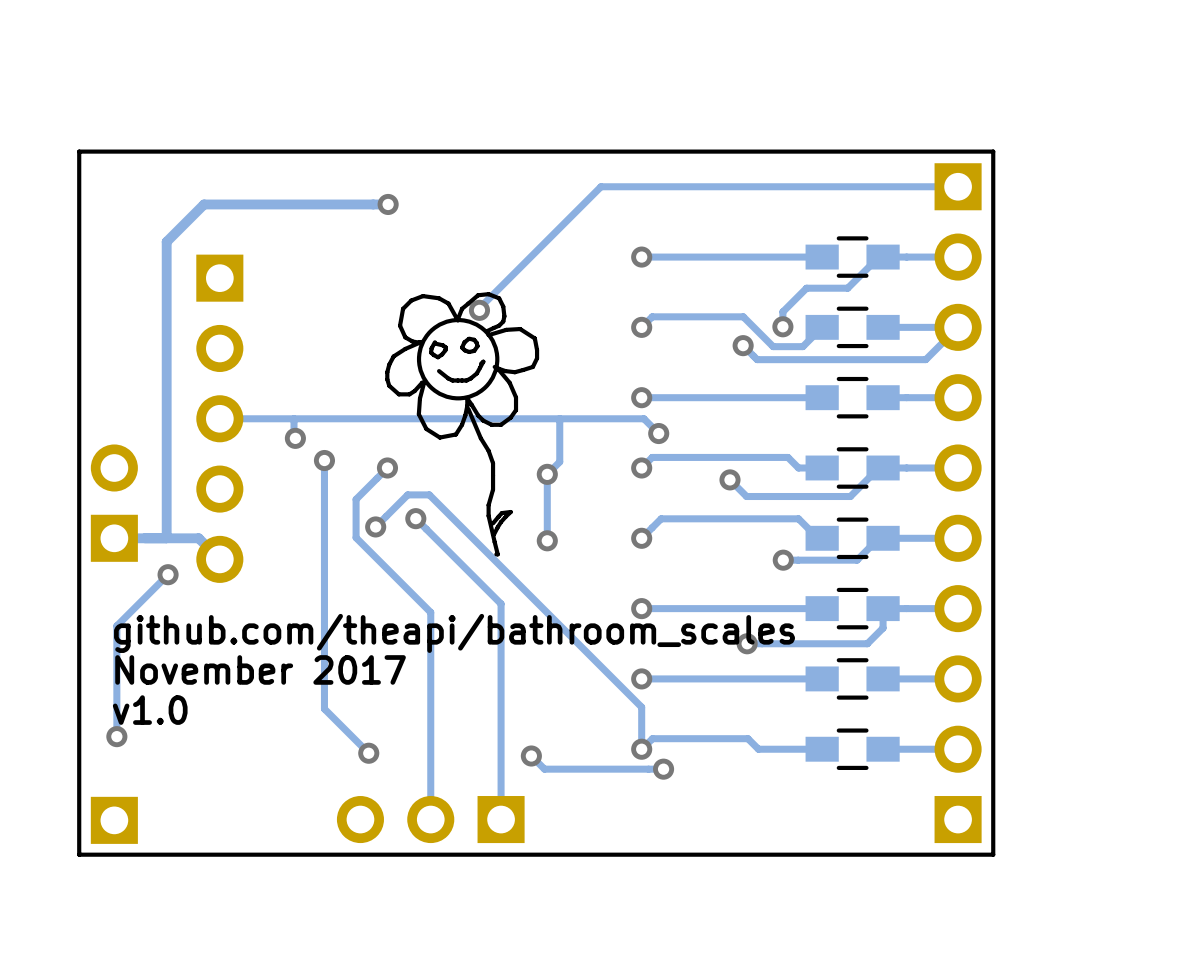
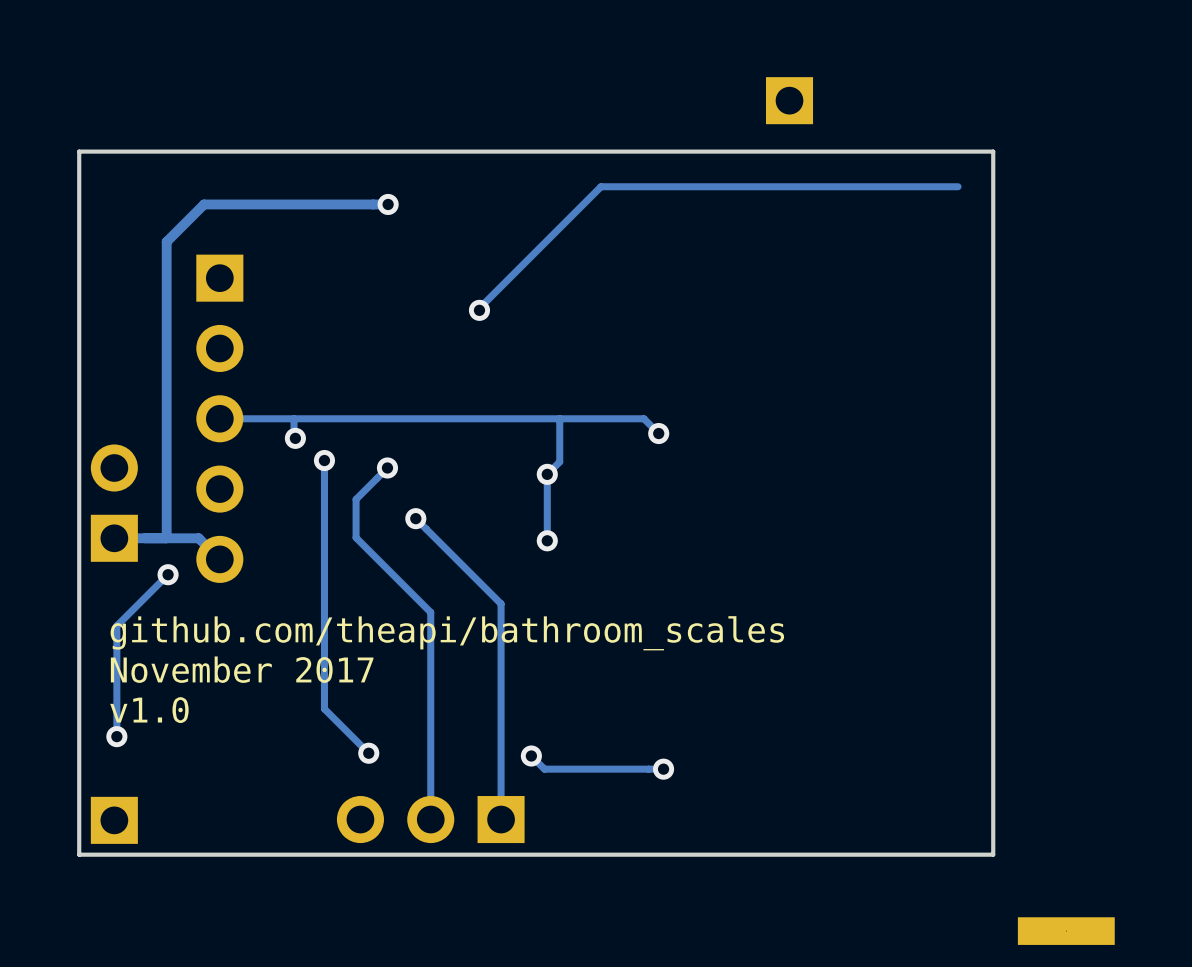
part position: (958, 186) -> (789, 100)
via: (641, 257) -> none
track: (822, 257) (641, 257) -> none
part: (852, 257) -> none
track: (958, 257) (878, 257) (847, 288) (806, 288) (782, 311) (782, 326) -> none
drawing: [385, 292, 540, 557] -> none
via: (782, 326) -> none
via: (641, 327) -> none
track: (822, 327) (802, 346) (773, 346) (743, 316) (652, 316) (641, 327) -> none
part: (852, 327) -> none
track: (883, 327) (958, 327) (925, 359) (757, 359) (743, 345) -> none
via: (743, 345) -> none
via: (641, 397) -> none
track: (822, 397) (641, 397) -> none
part: (852, 397) -> none
track: (958, 397) (883, 397) -> none
via: (641, 467) -> none
track: (822, 467) (798, 467) (787, 457) (652, 457) (641, 467) -> none
part: (852, 467) -> none
track: (958, 467) (878, 467) (850, 496) (746, 496) (729, 479) -> none
via: (729, 479) -> none
track: (375, 526) (407, 494) (429, 494) (641, 707) (641, 749) -> none
via: (375, 526) -> none
via: (641, 538) -> none
track: (822, 538) (818, 538) (798, 518) (661, 518) (641, 538) -> none
part: (852, 538) -> none
track: (958, 538) (878, 538) (857, 560) (783, 560) -> none
part: (958, 538) -> none
via: (783, 560) -> none
via: (641, 608) -> none
track: (822, 608) (641, 608) -> none
part: (852, 608) -> none
track: (958, 608) (883, 608) (883, 628) (867, 643) (747, 643) -> none
via: (747, 643) -> none
via: (641, 678) -> none
track: (822, 678) (641, 678) -> none
part: (852, 678) -> none
track: (958, 678) (883, 678) -> none
via: (641, 749) -> none
track: (822, 749) (758, 749) (747, 738) (652, 738) (641, 749) -> none
part: (852, 749) -> none
track: (958, 749) (883, 749) -> none
part: none -> (1066, 931)

